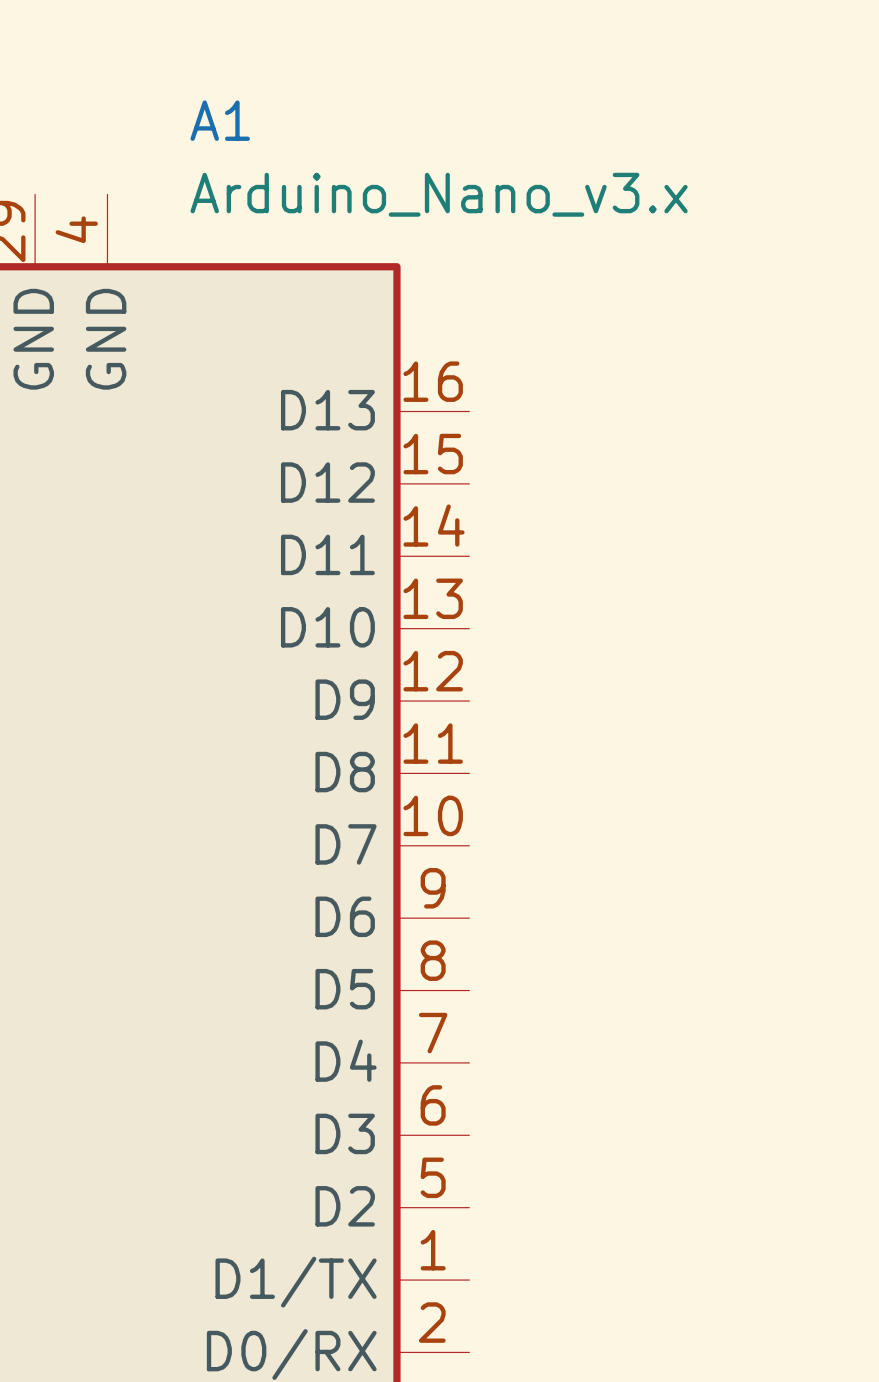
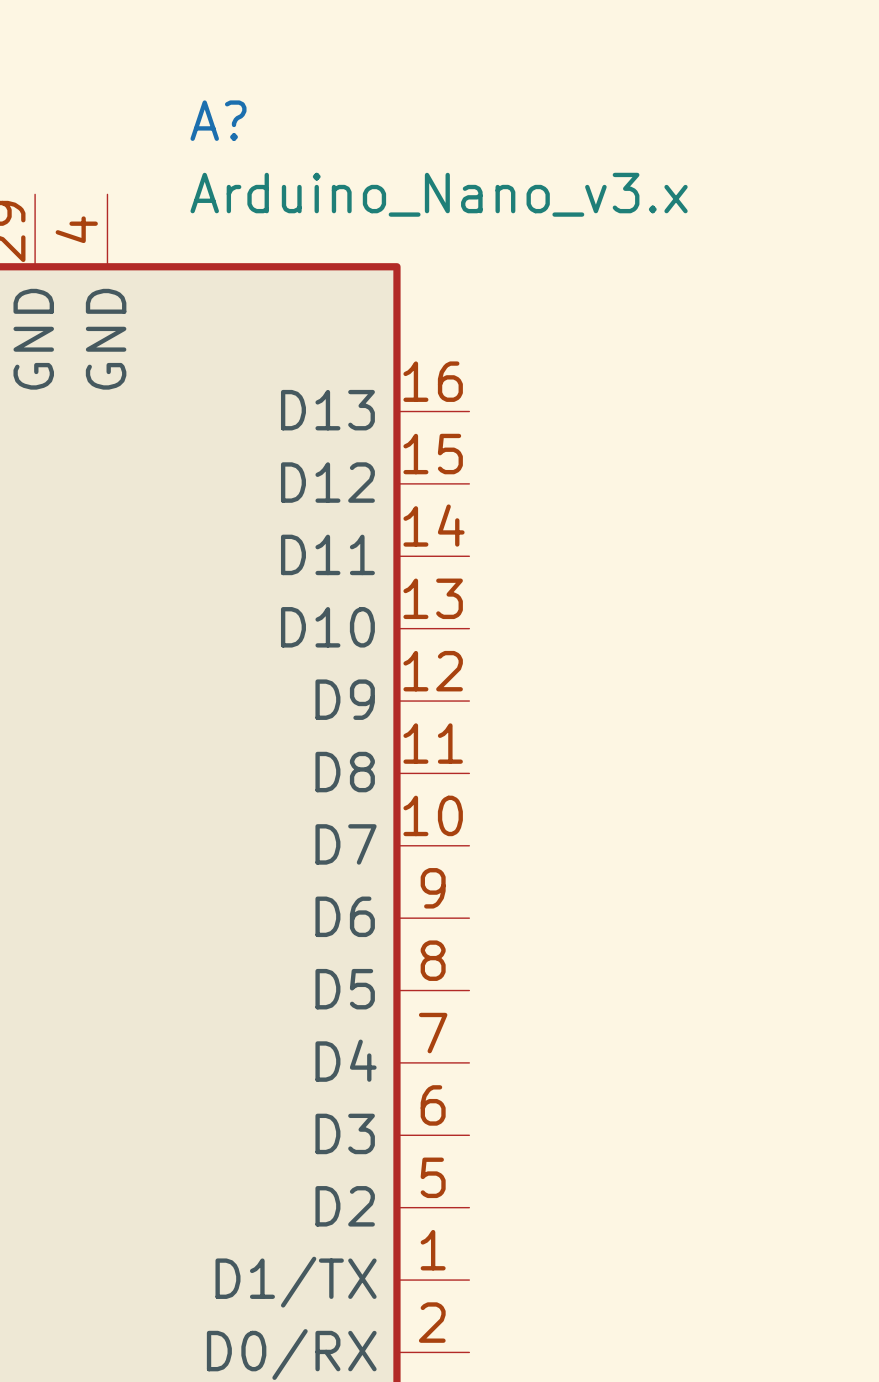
A1 name: A1 (220, 120) -> A? (218, 120)

